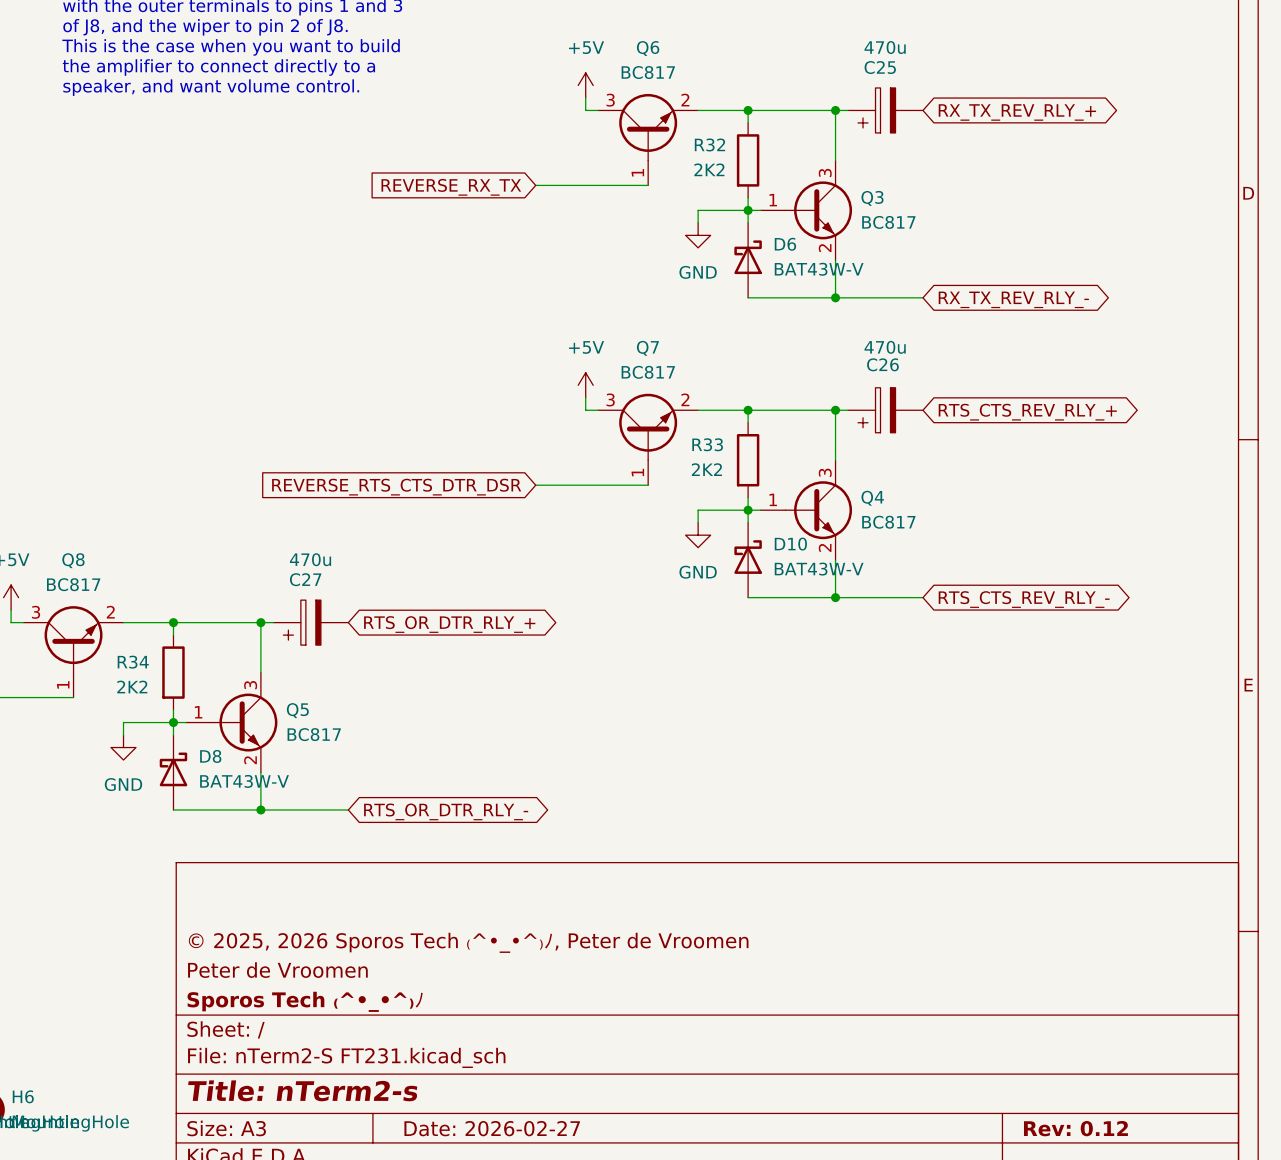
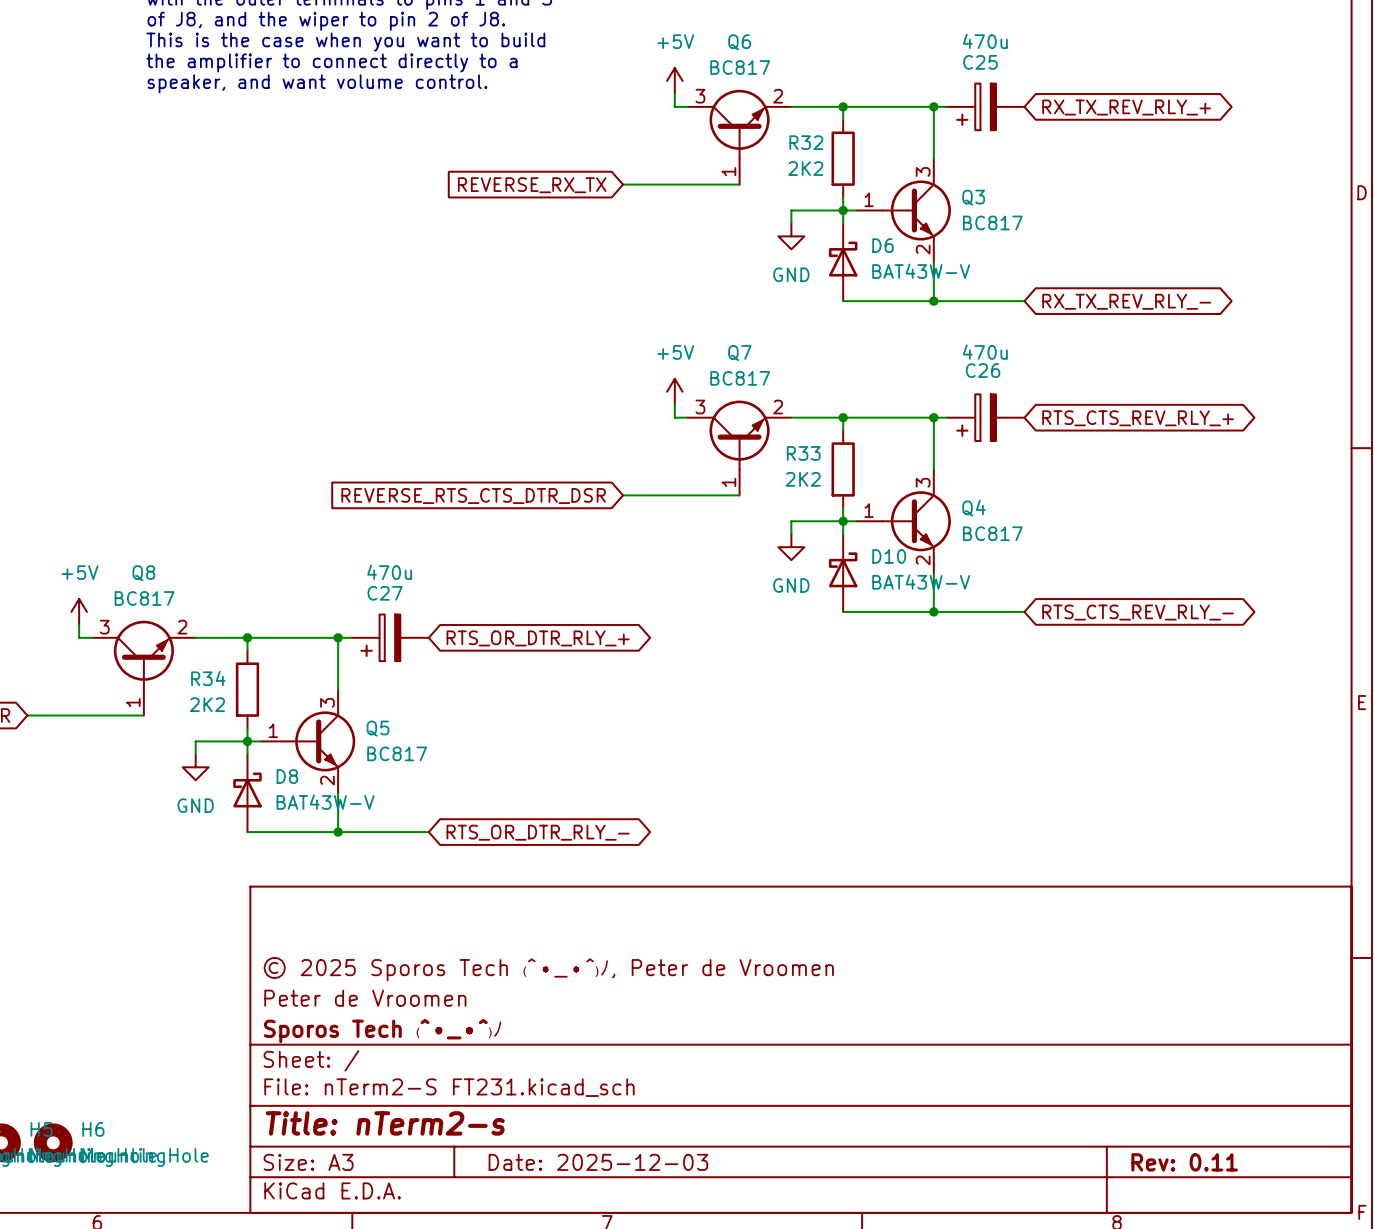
title block: © 2025, 2026 Sporos Tech ₍^•_•^₎ﾉ, Peter de Vroomen (468, 942) -> © 2025 Sporos Tech ₍^•_•^₎ﾉ, Peter de Vroomen (548, 969)
title block: Date: 2026-02-27 (492, 1128) -> Date: 2025-12-03 (598, 1162)
title block: Rev: 0.12 (1075, 1128) -> Rev: 0.11 (1184, 1162)

